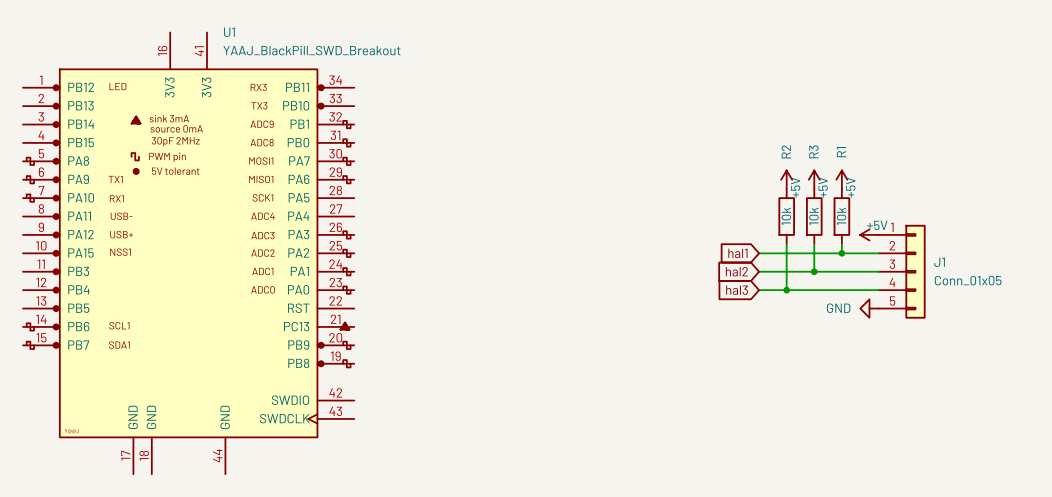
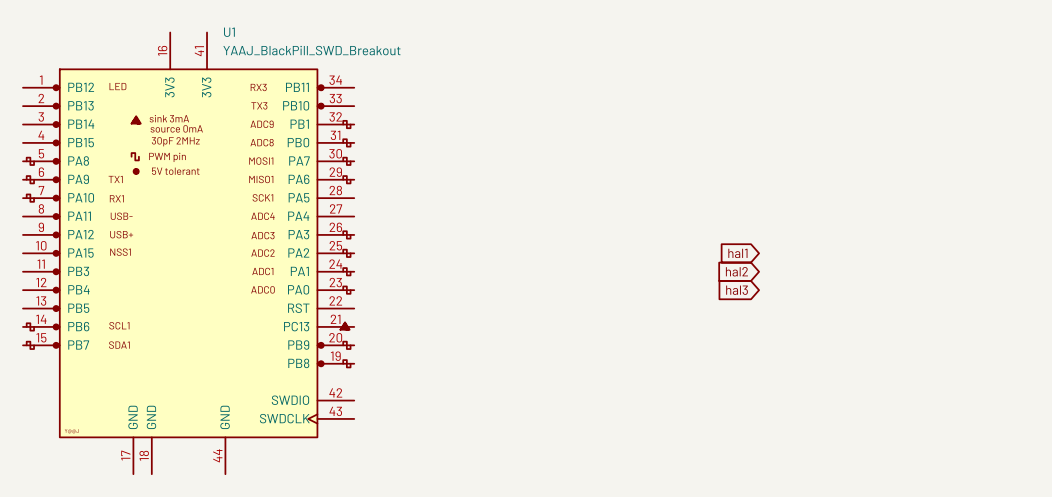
power symbol: +5V (786, 179) -> none
power symbol: +5V (814, 179) -> none
power symbol: +5V (841, 179) -> none
R2: 10k (786, 216) -> none
R3: 10k (814, 216) -> none
R1: 10k (841, 216) -> none
power symbol: +5V (869, 234) -> none
wire: (786, 244) (786, 290) -> none
wire: (814, 244) (814, 271) -> none
wire: (841, 244) (841, 253) -> none
wire: (759, 253) (878, 253) -> none
junction: (841, 253) -> none
wire: (759, 271) (878, 271) -> none
junction: (814, 271) -> none
J1: Conn_01x05 (902, 271) -> none
wire: (759, 290) (878, 290) -> none
junction: (786, 290) -> none
power symbol: GND (869, 308) -> none

